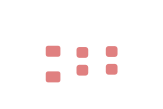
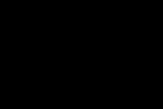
part: (111, 60) -> none
part: (82, 61) -> none
part: (53, 64) -> none

